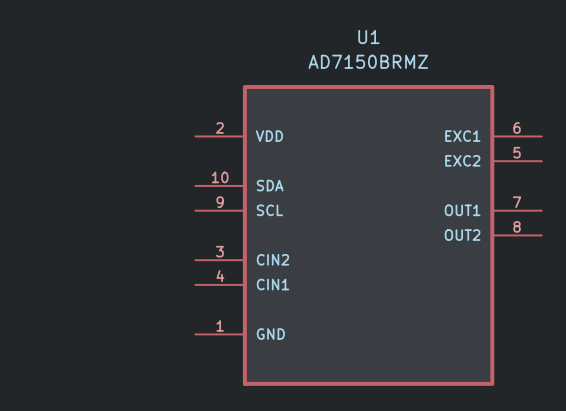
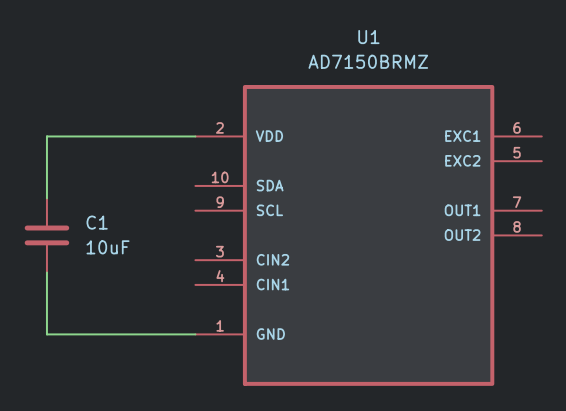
wire: none -> (195, 136) (46, 136) (46, 198)
C1: none -> 10uF (46, 235)
wire: none -> (46, 272) (46, 334) (195, 334)

